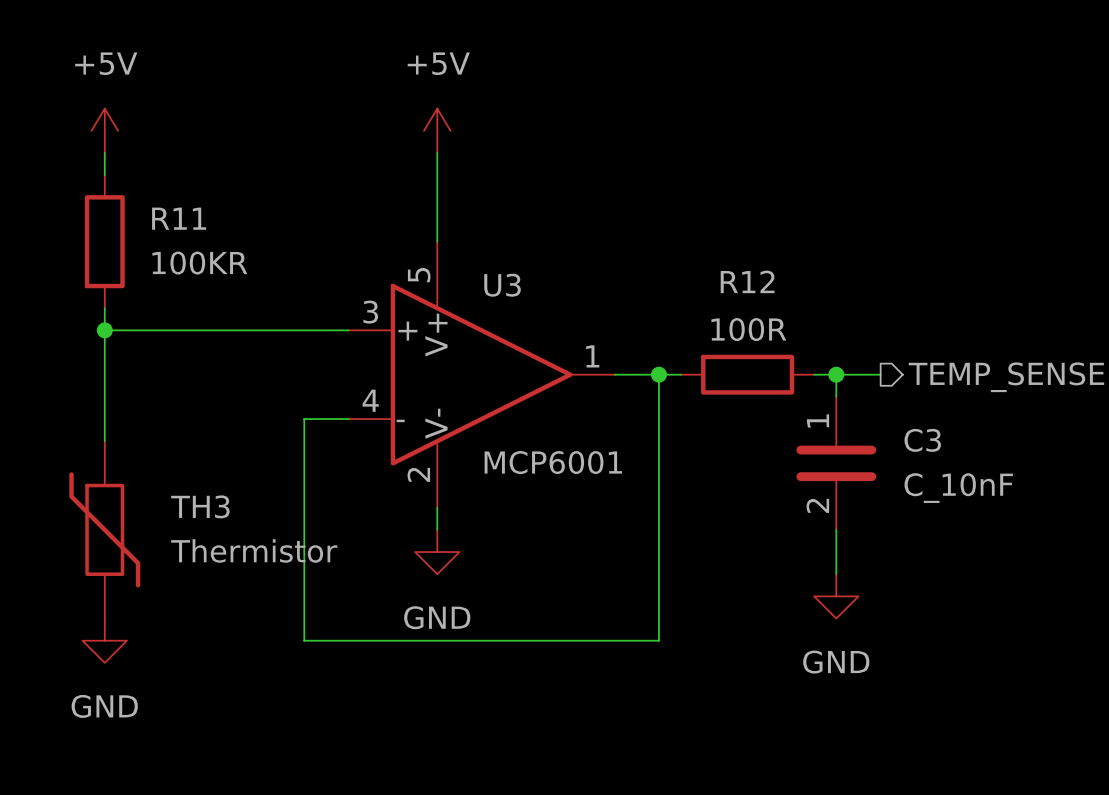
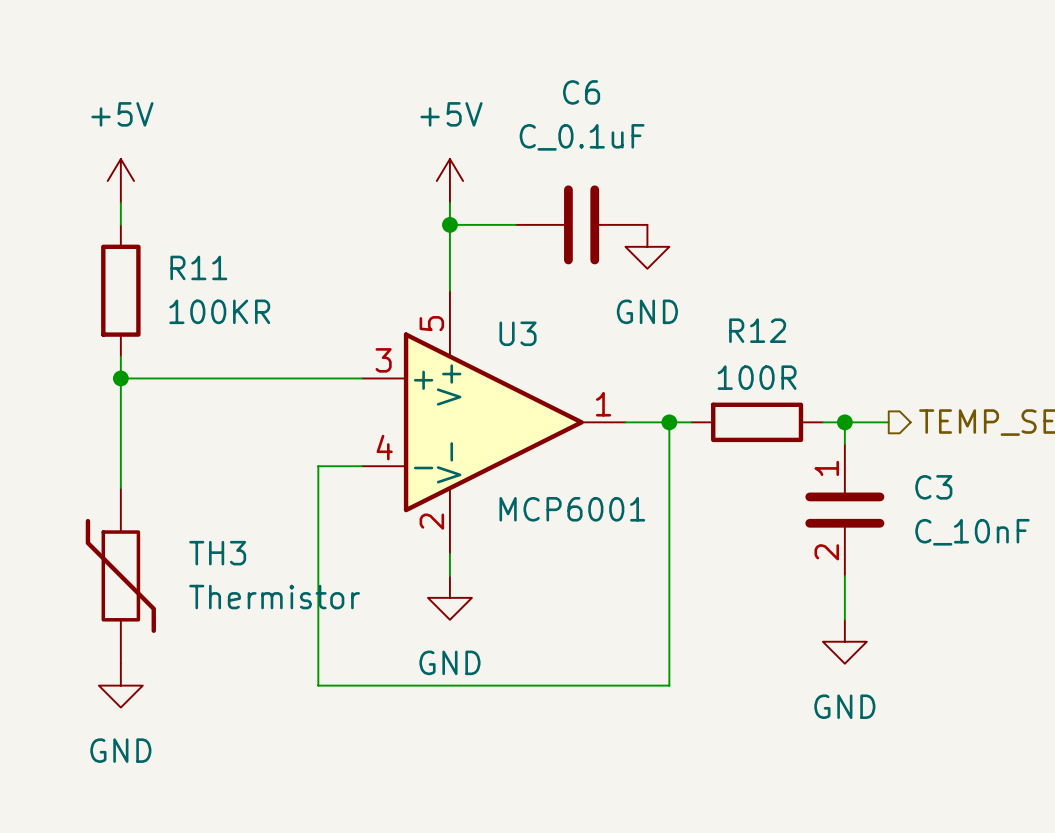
wire: none -> (449, 224) (515, 224)
junction: none -> (449, 224)
C6: none -> C_0.1uF (581, 224)
power symbol: none -> GND (647, 246)

